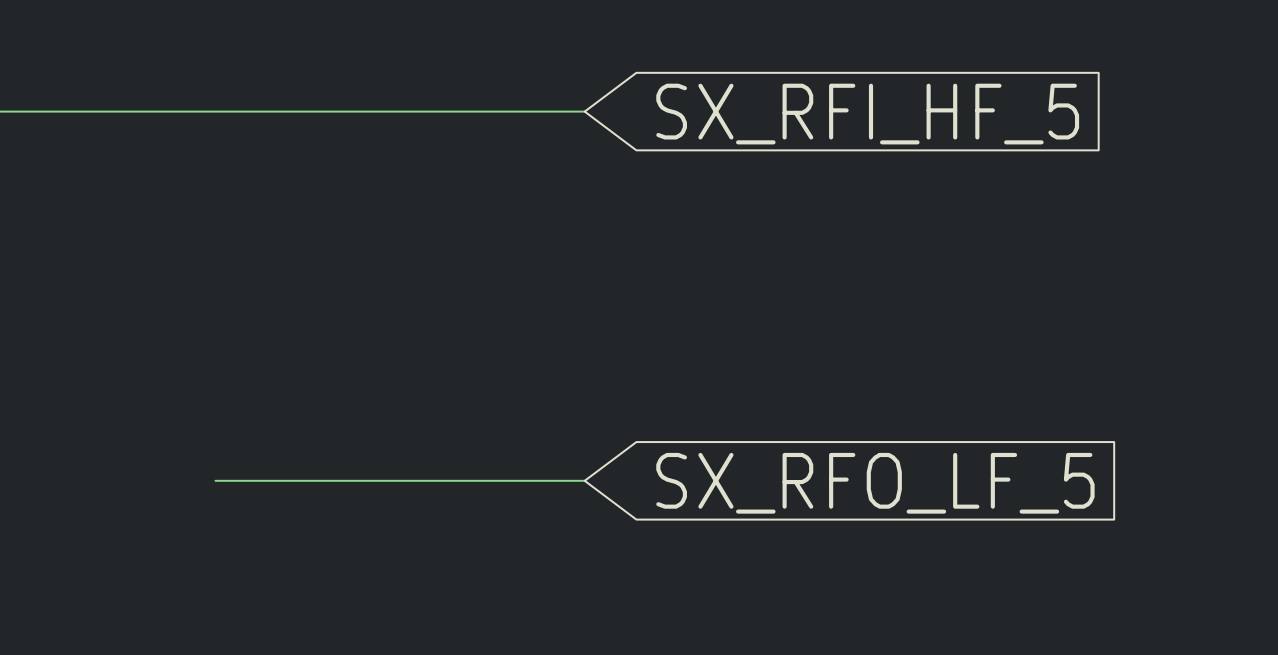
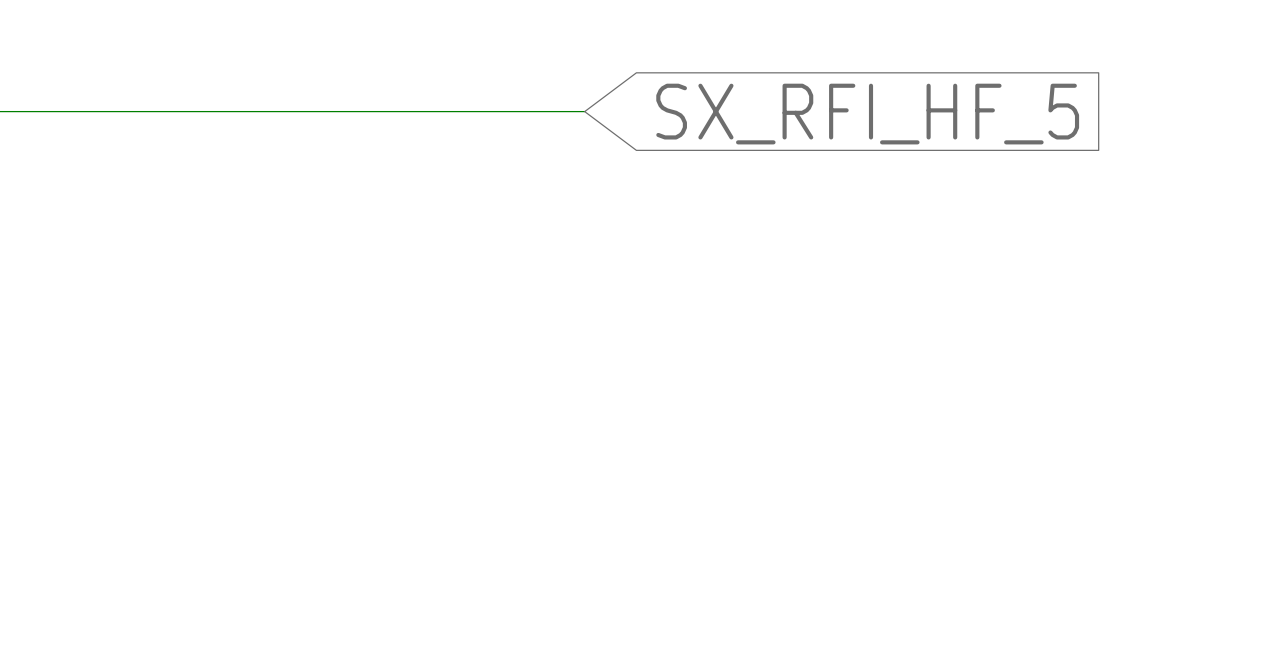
wire: (215, 480) (584, 480) -> none
global label: SX_RFO_LF_5 (875, 483) -> none

